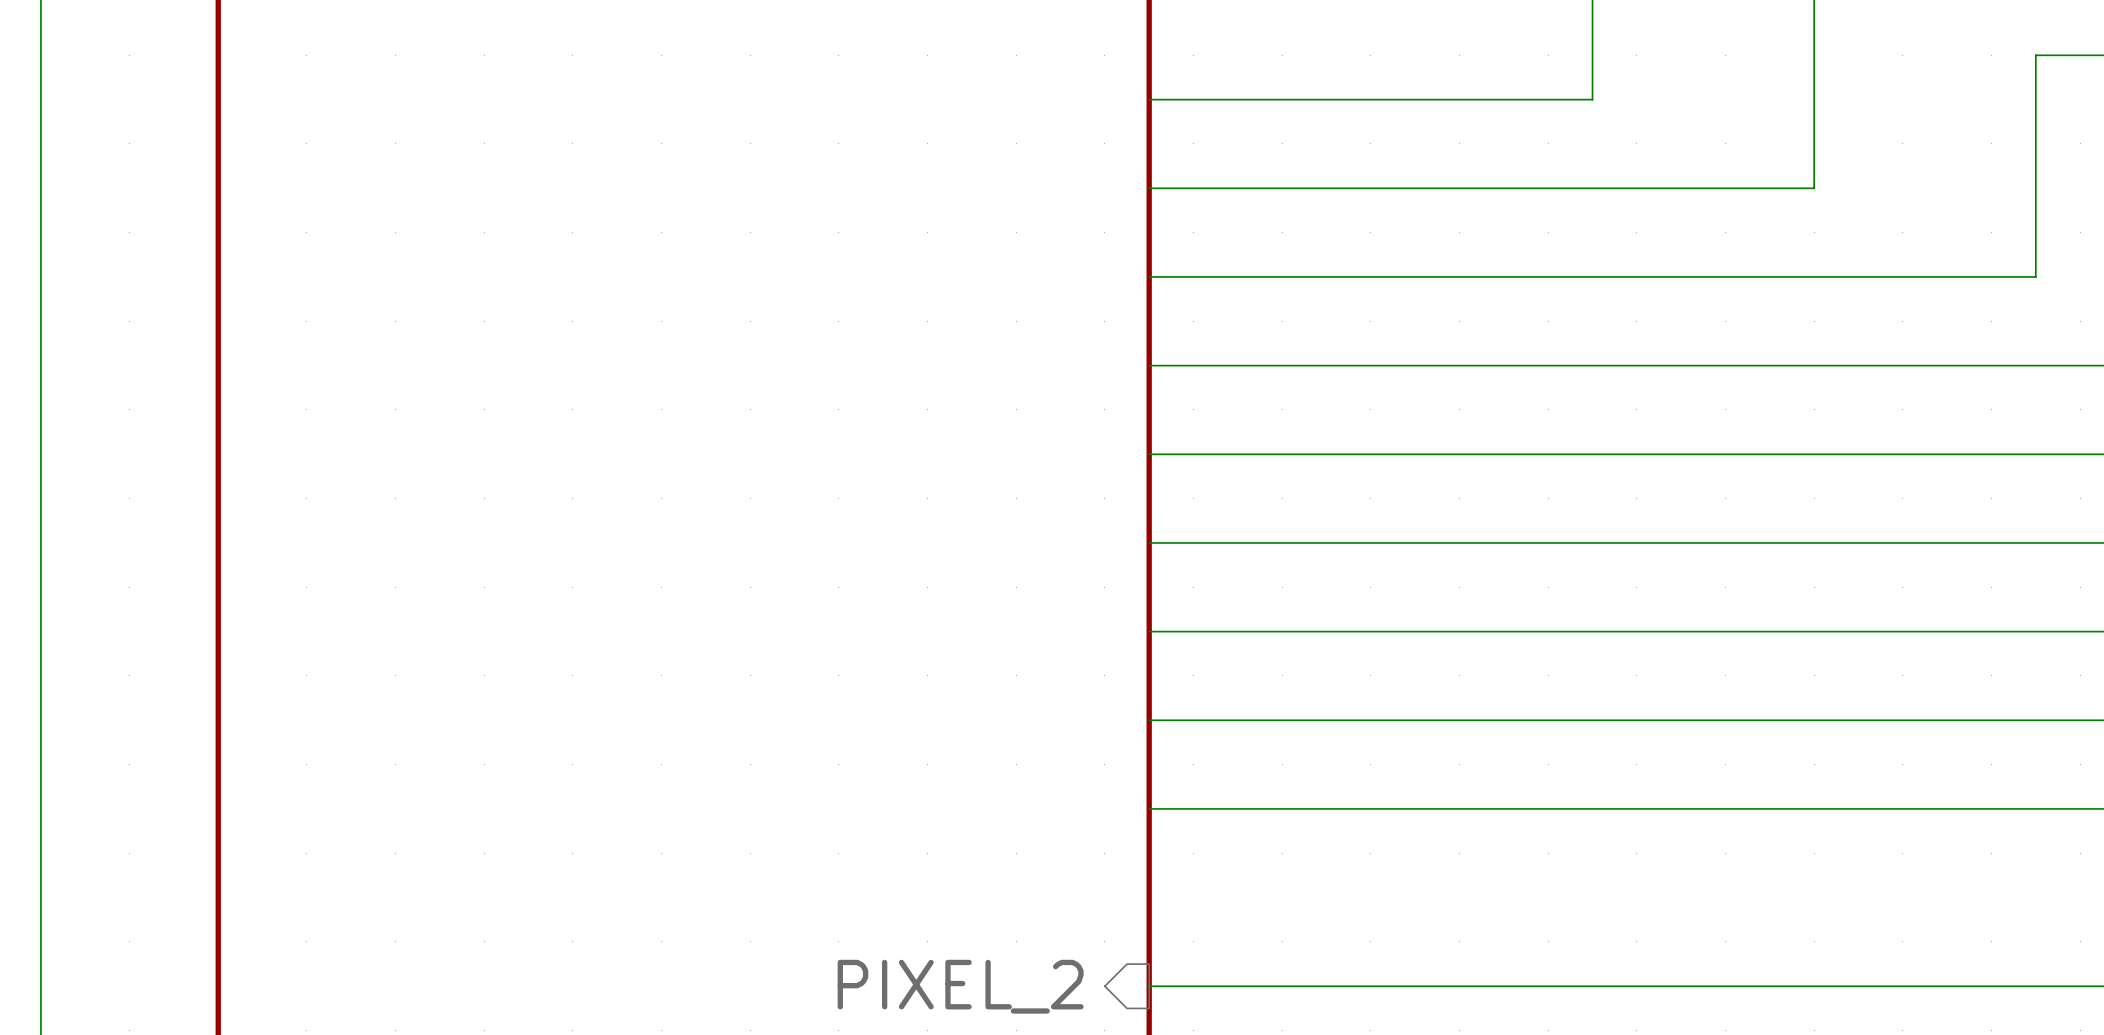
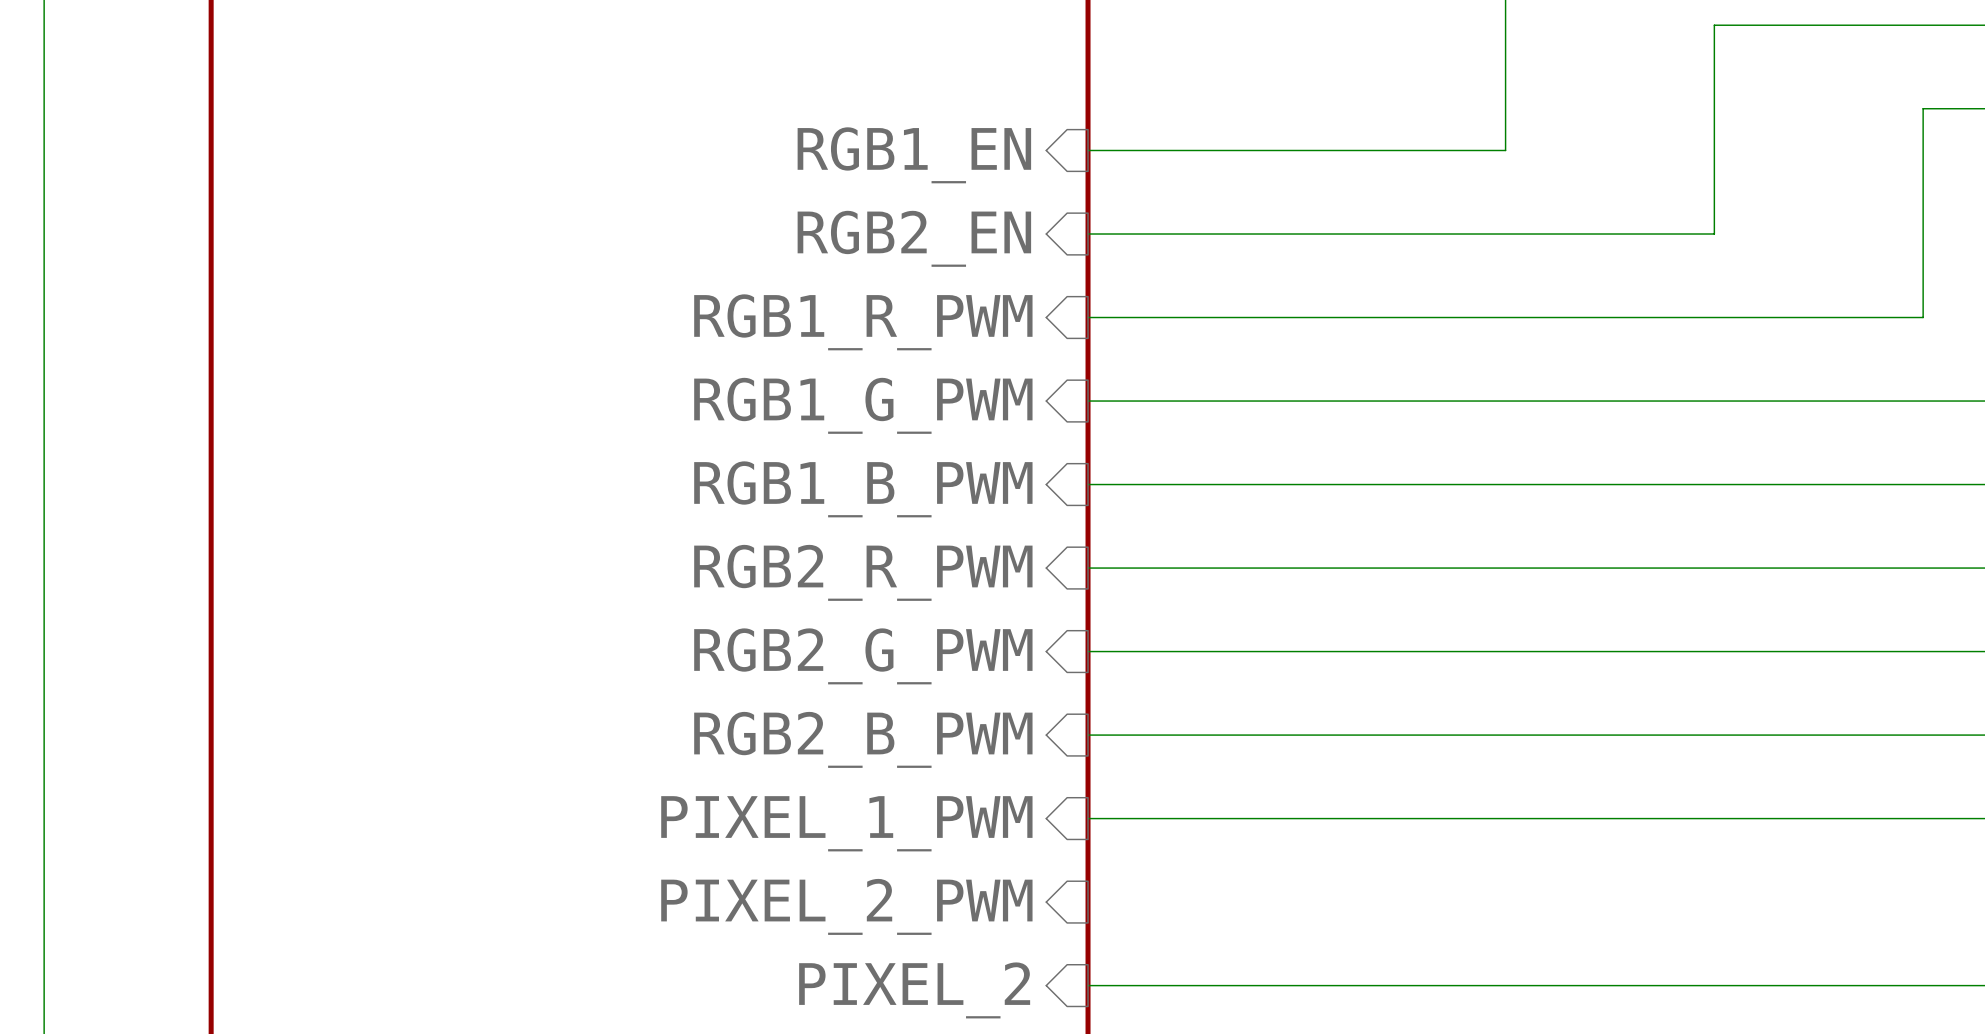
sheet pin: none -> RGB1_EN (914, 155)
sheet pin: none -> RGB2_EN (914, 238)
sheet pin: none -> RGB1_R_PWM (863, 322)
sheet pin: none -> RGB1_G_PWM (863, 405)
sheet pin: none -> RGB1_B_PWM (863, 489)
sheet pin: none -> RGB2_R_PWM (863, 572)
sheet pin: none -> RGB2_G_PWM (863, 656)
sheet pin: none -> RGB2_B_PWM (863, 739)
sheet pin: none -> PIXEL_1_PWM (846, 823)
sheet pin: none -> PIXEL_2_PWM (846, 906)

